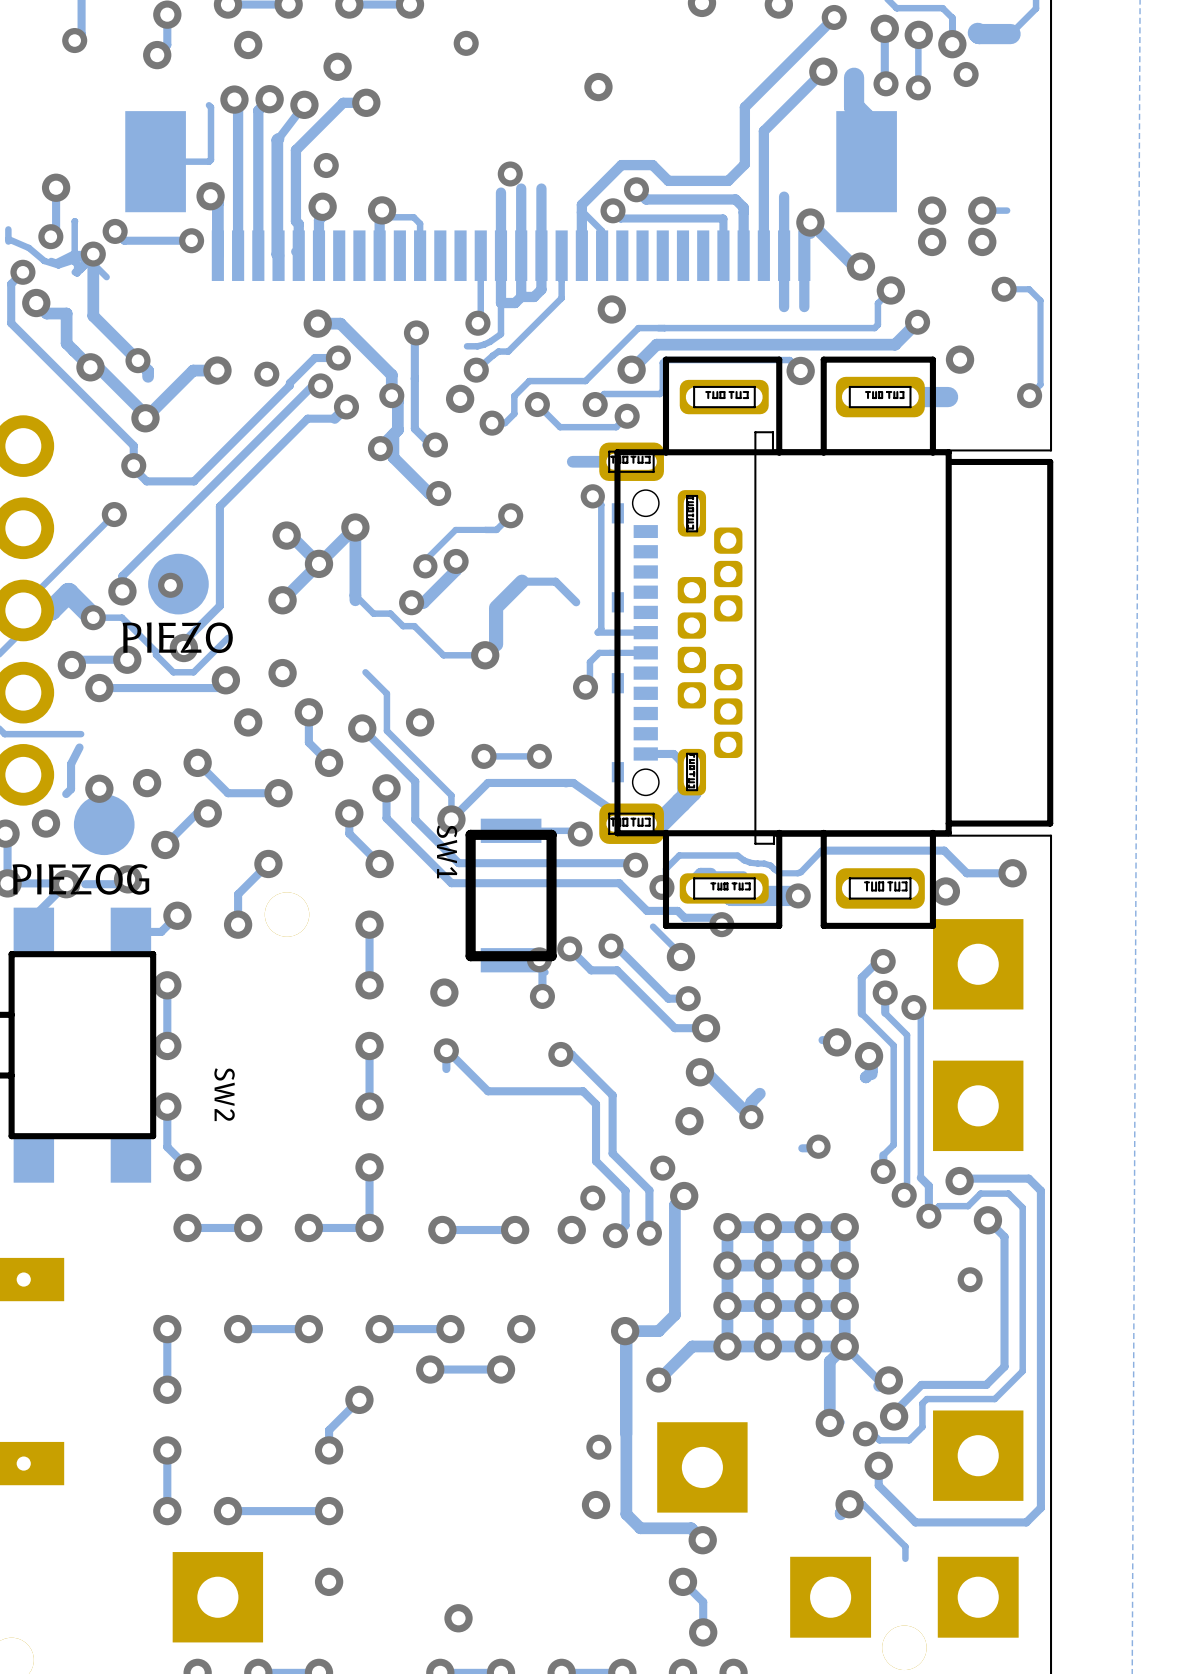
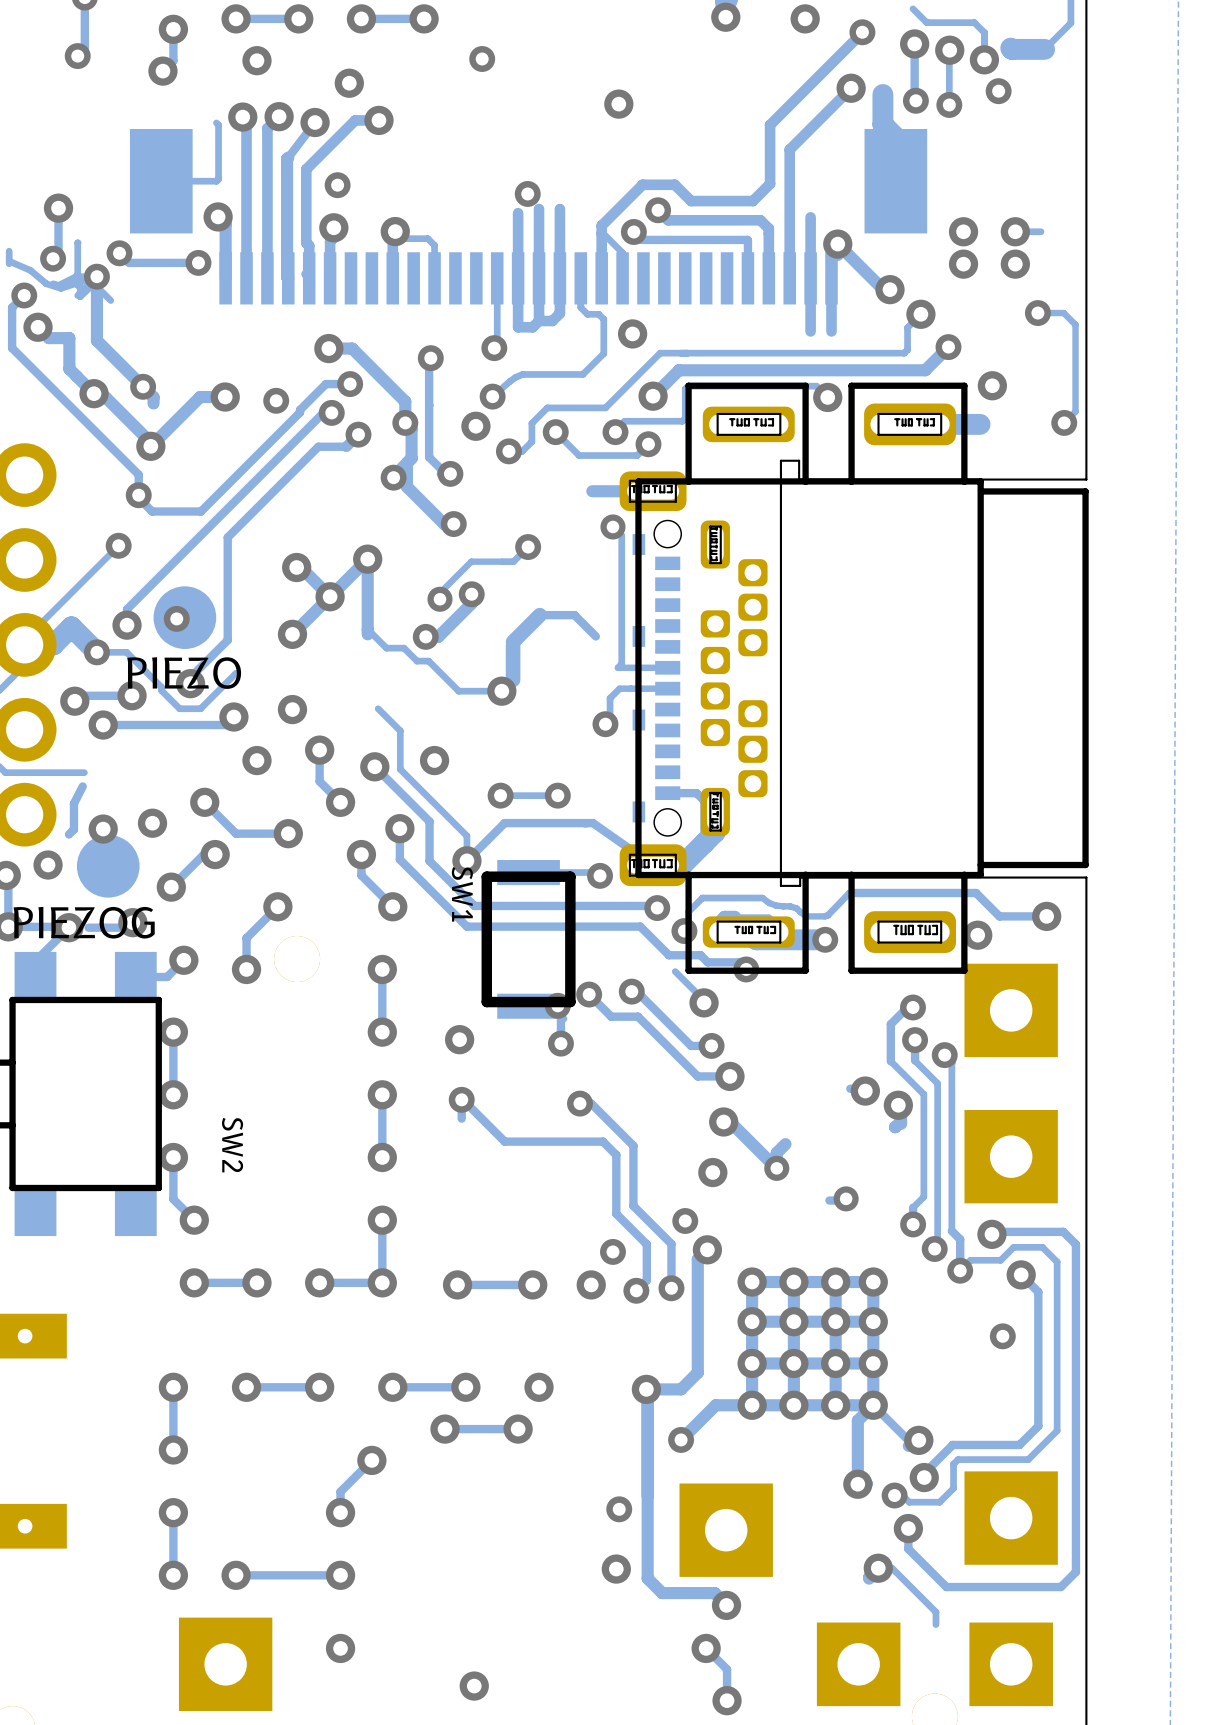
track: (500, 255) (500, 334) (484, 344) (467, 346) -> none
track: (561, 284) (561, 298) (508, 351) (498, 351) -> (580, 307) (587, 314) (598, 314) (603, 319) (603, 353) (582, 374) (522, 374) (515, 377)

